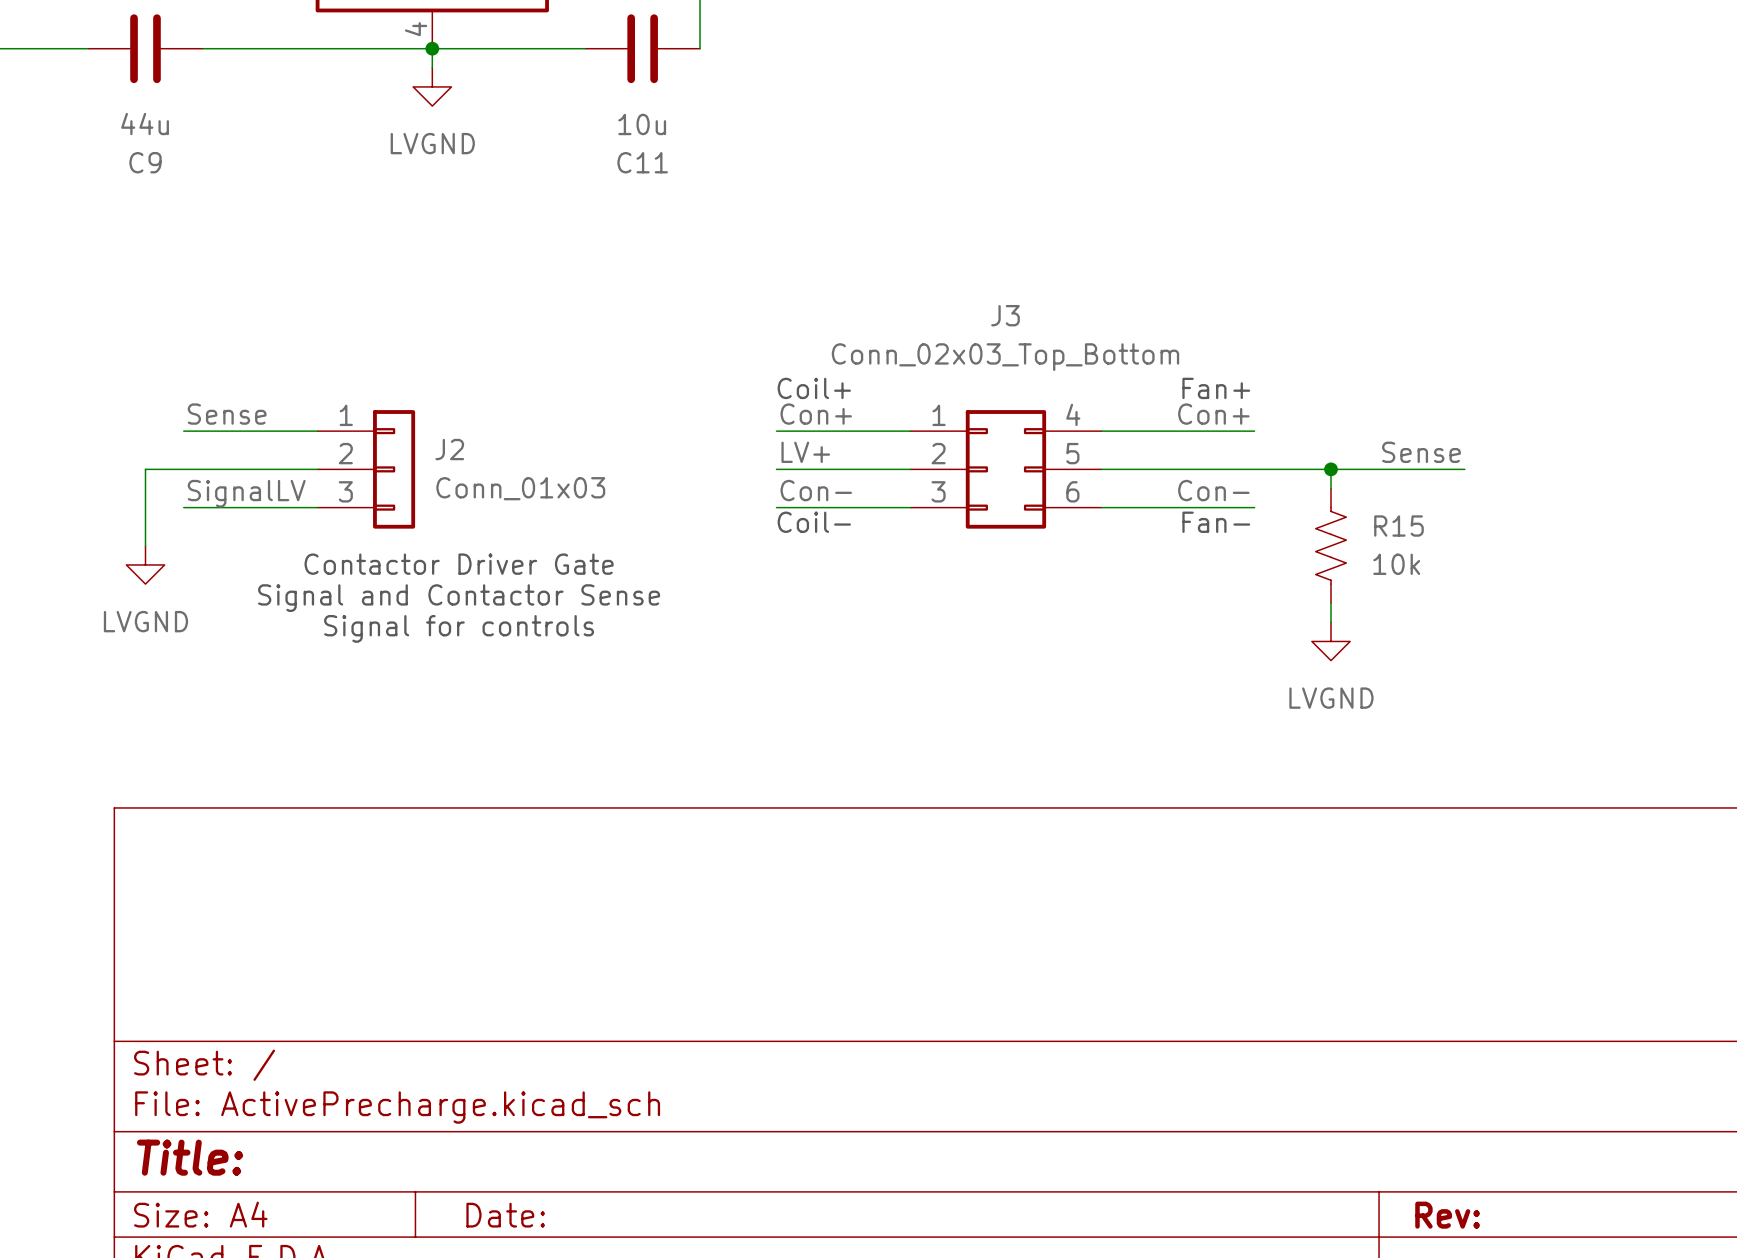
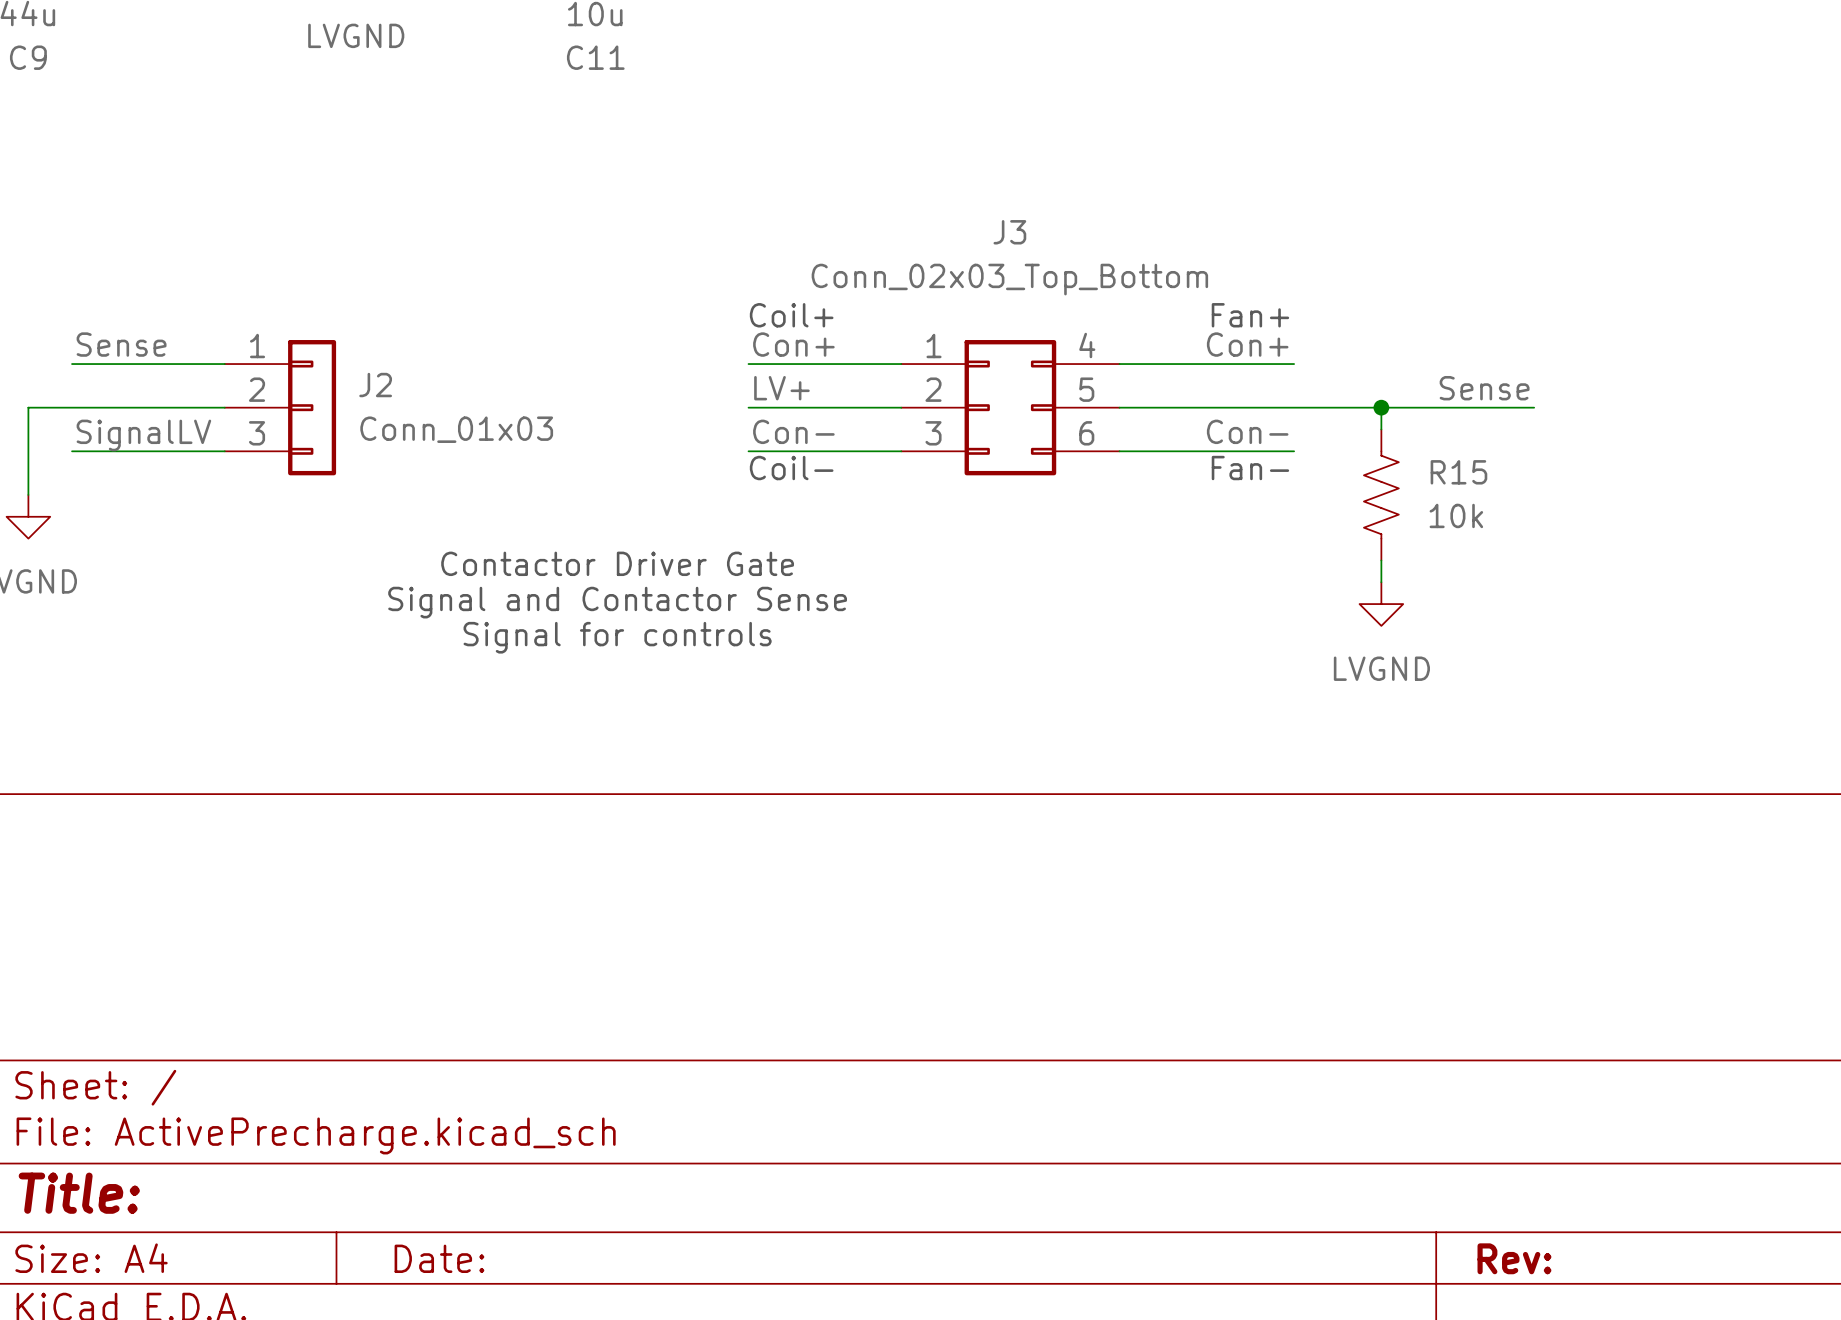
text position: Contactor Driver Gate (459, 564) -> Contactor Driver Gate (617, 563)
text position: Signal and Contactor Sense (459, 598) -> Signal and Contactor Sense (617, 602)
text position: Signal for controls (459, 628) -> Signal for controls (617, 637)

